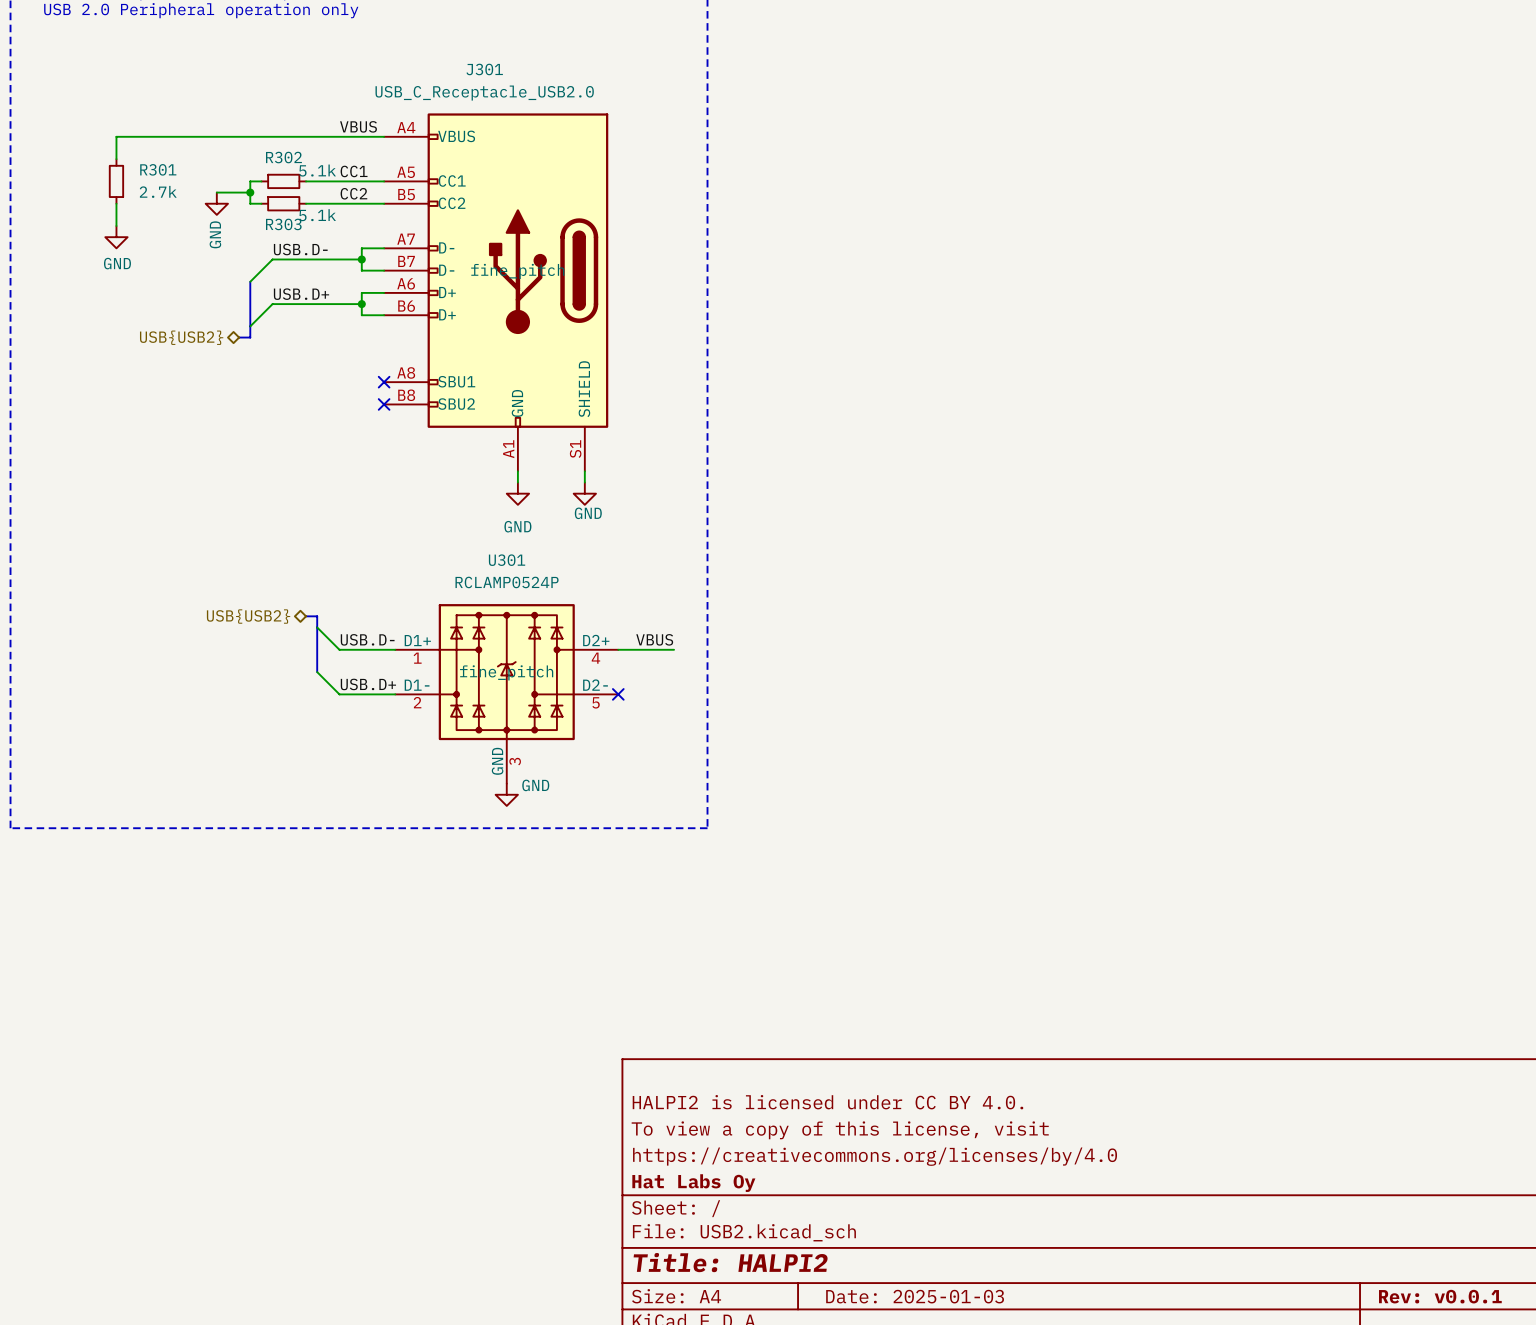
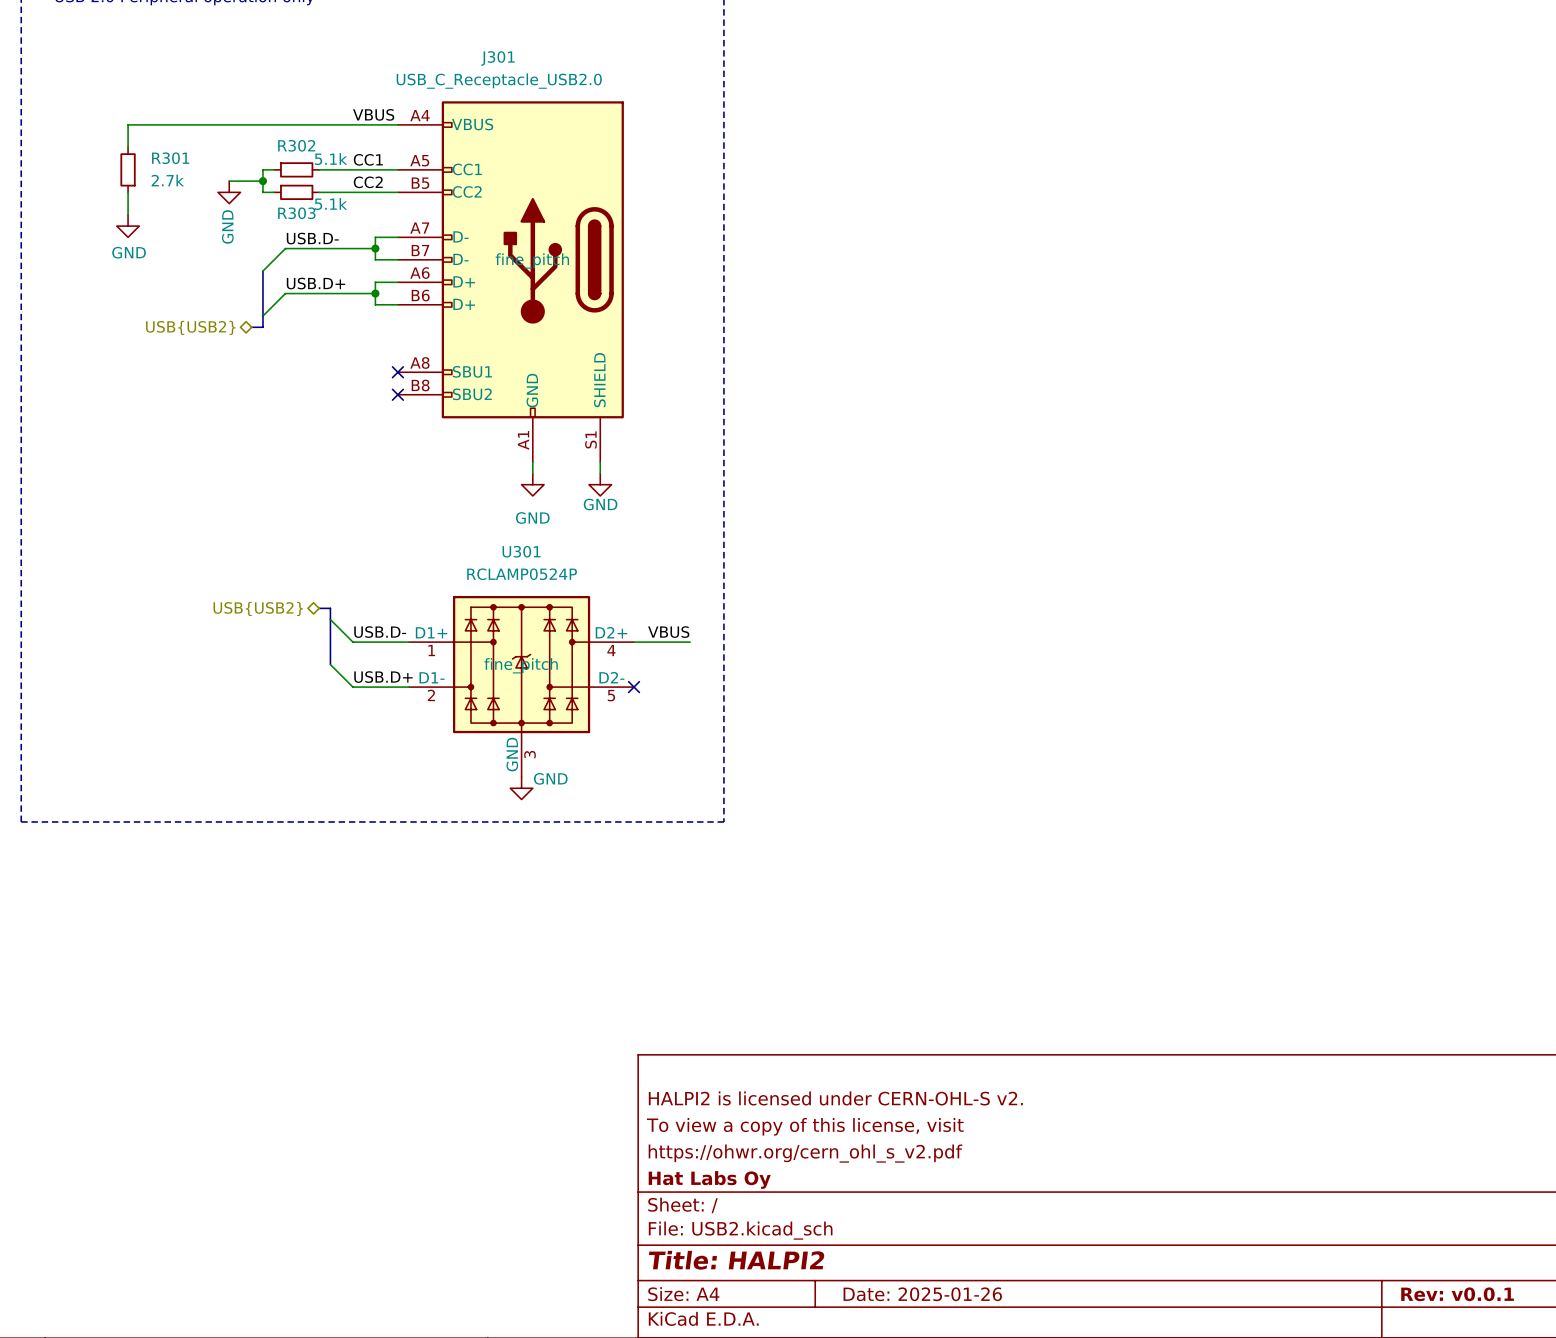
title block: HALPI2 is licensed under CC BY 4.0. (827, 1102) -> HALPI2 is licensed under CERN-OHL-S v2. (835, 1098)
title block: https://creativecommons.org/licenses/by/4.0 (875, 1156) -> https://ohwr.org/cern_ohl_s_v2.pdf (805, 1153)
title block: Date: 2025-01-03 (915, 1296) -> Date: 2025-01-26 (922, 1294)

